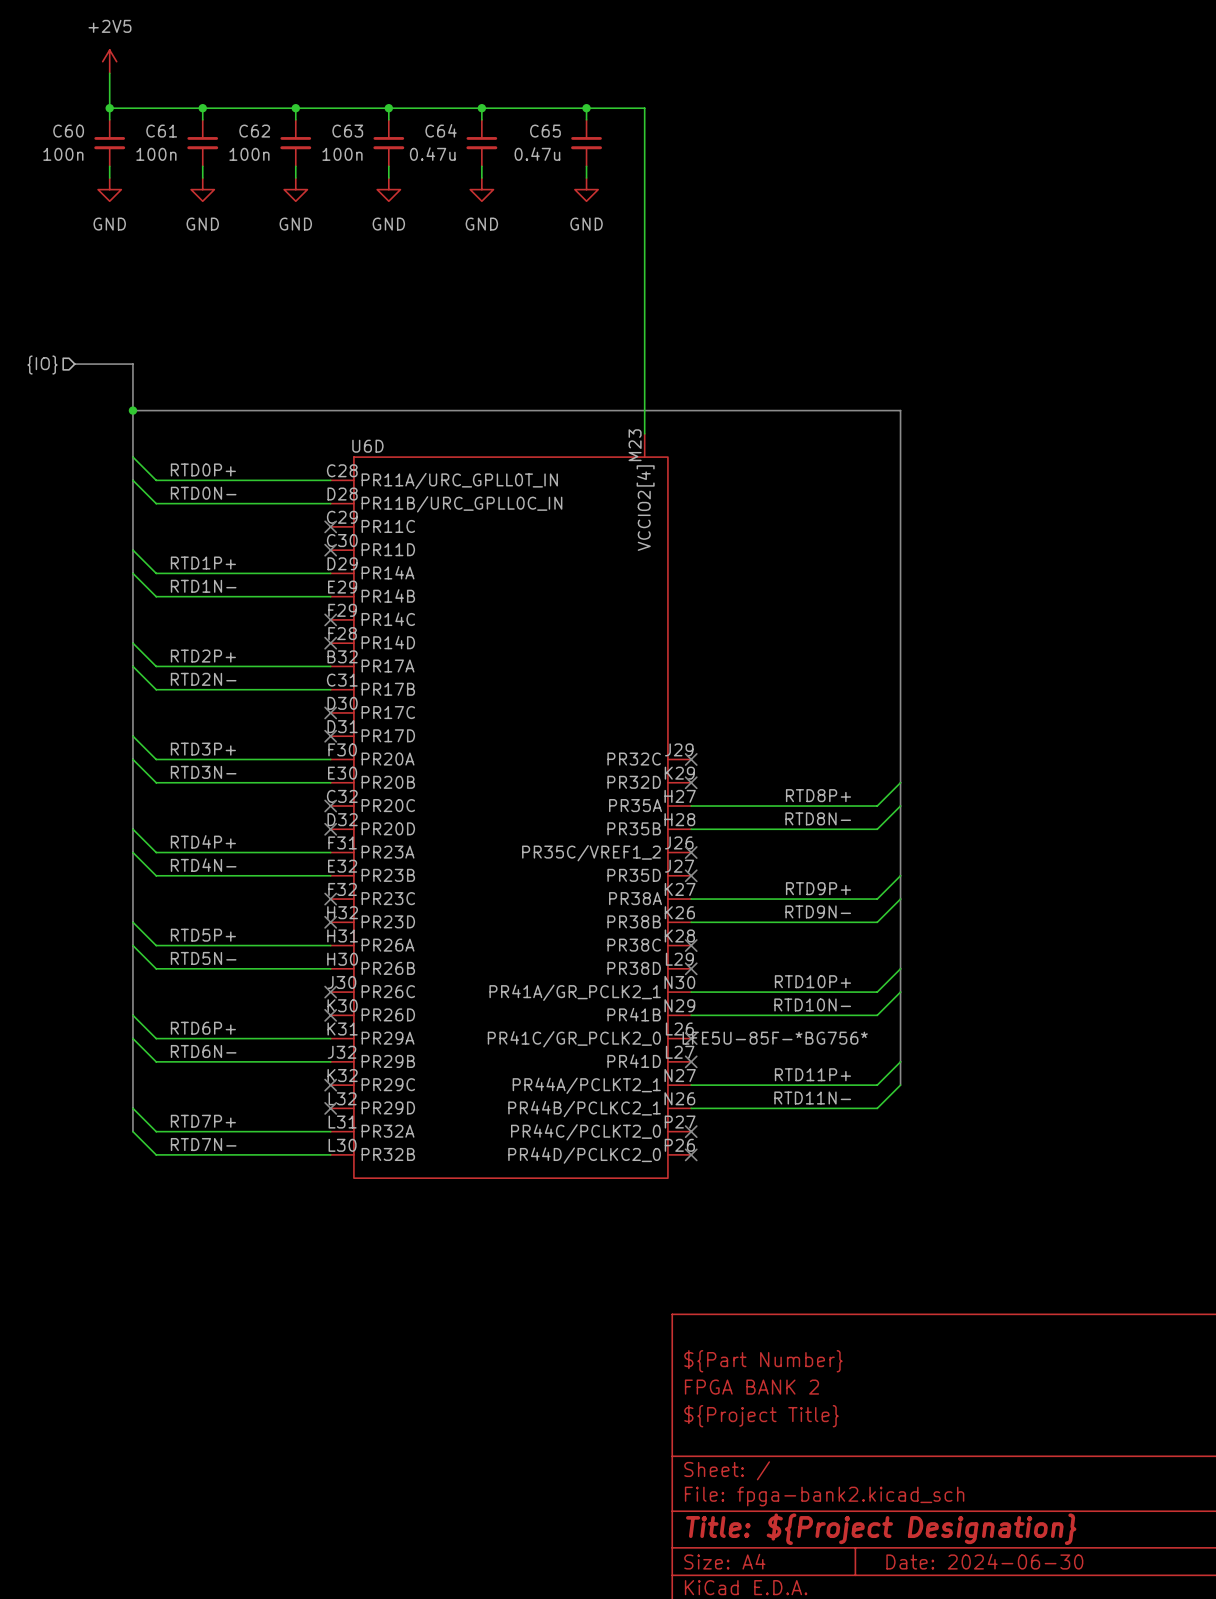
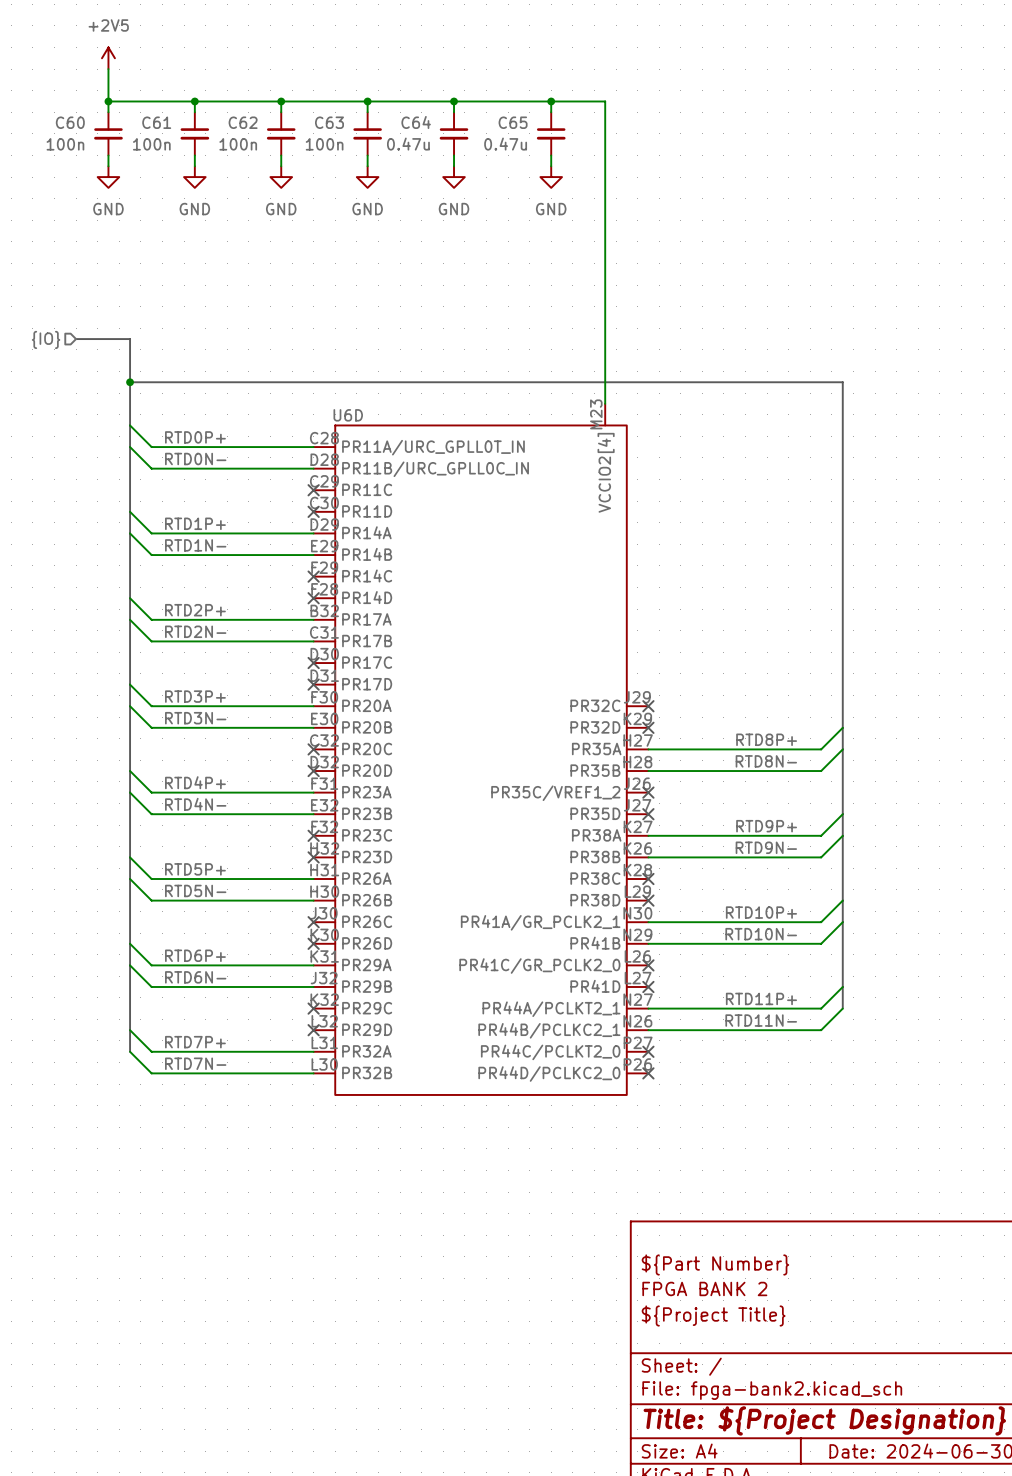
U6D value: LFE5U-85F-*BG756* (775, 1038) -> none

